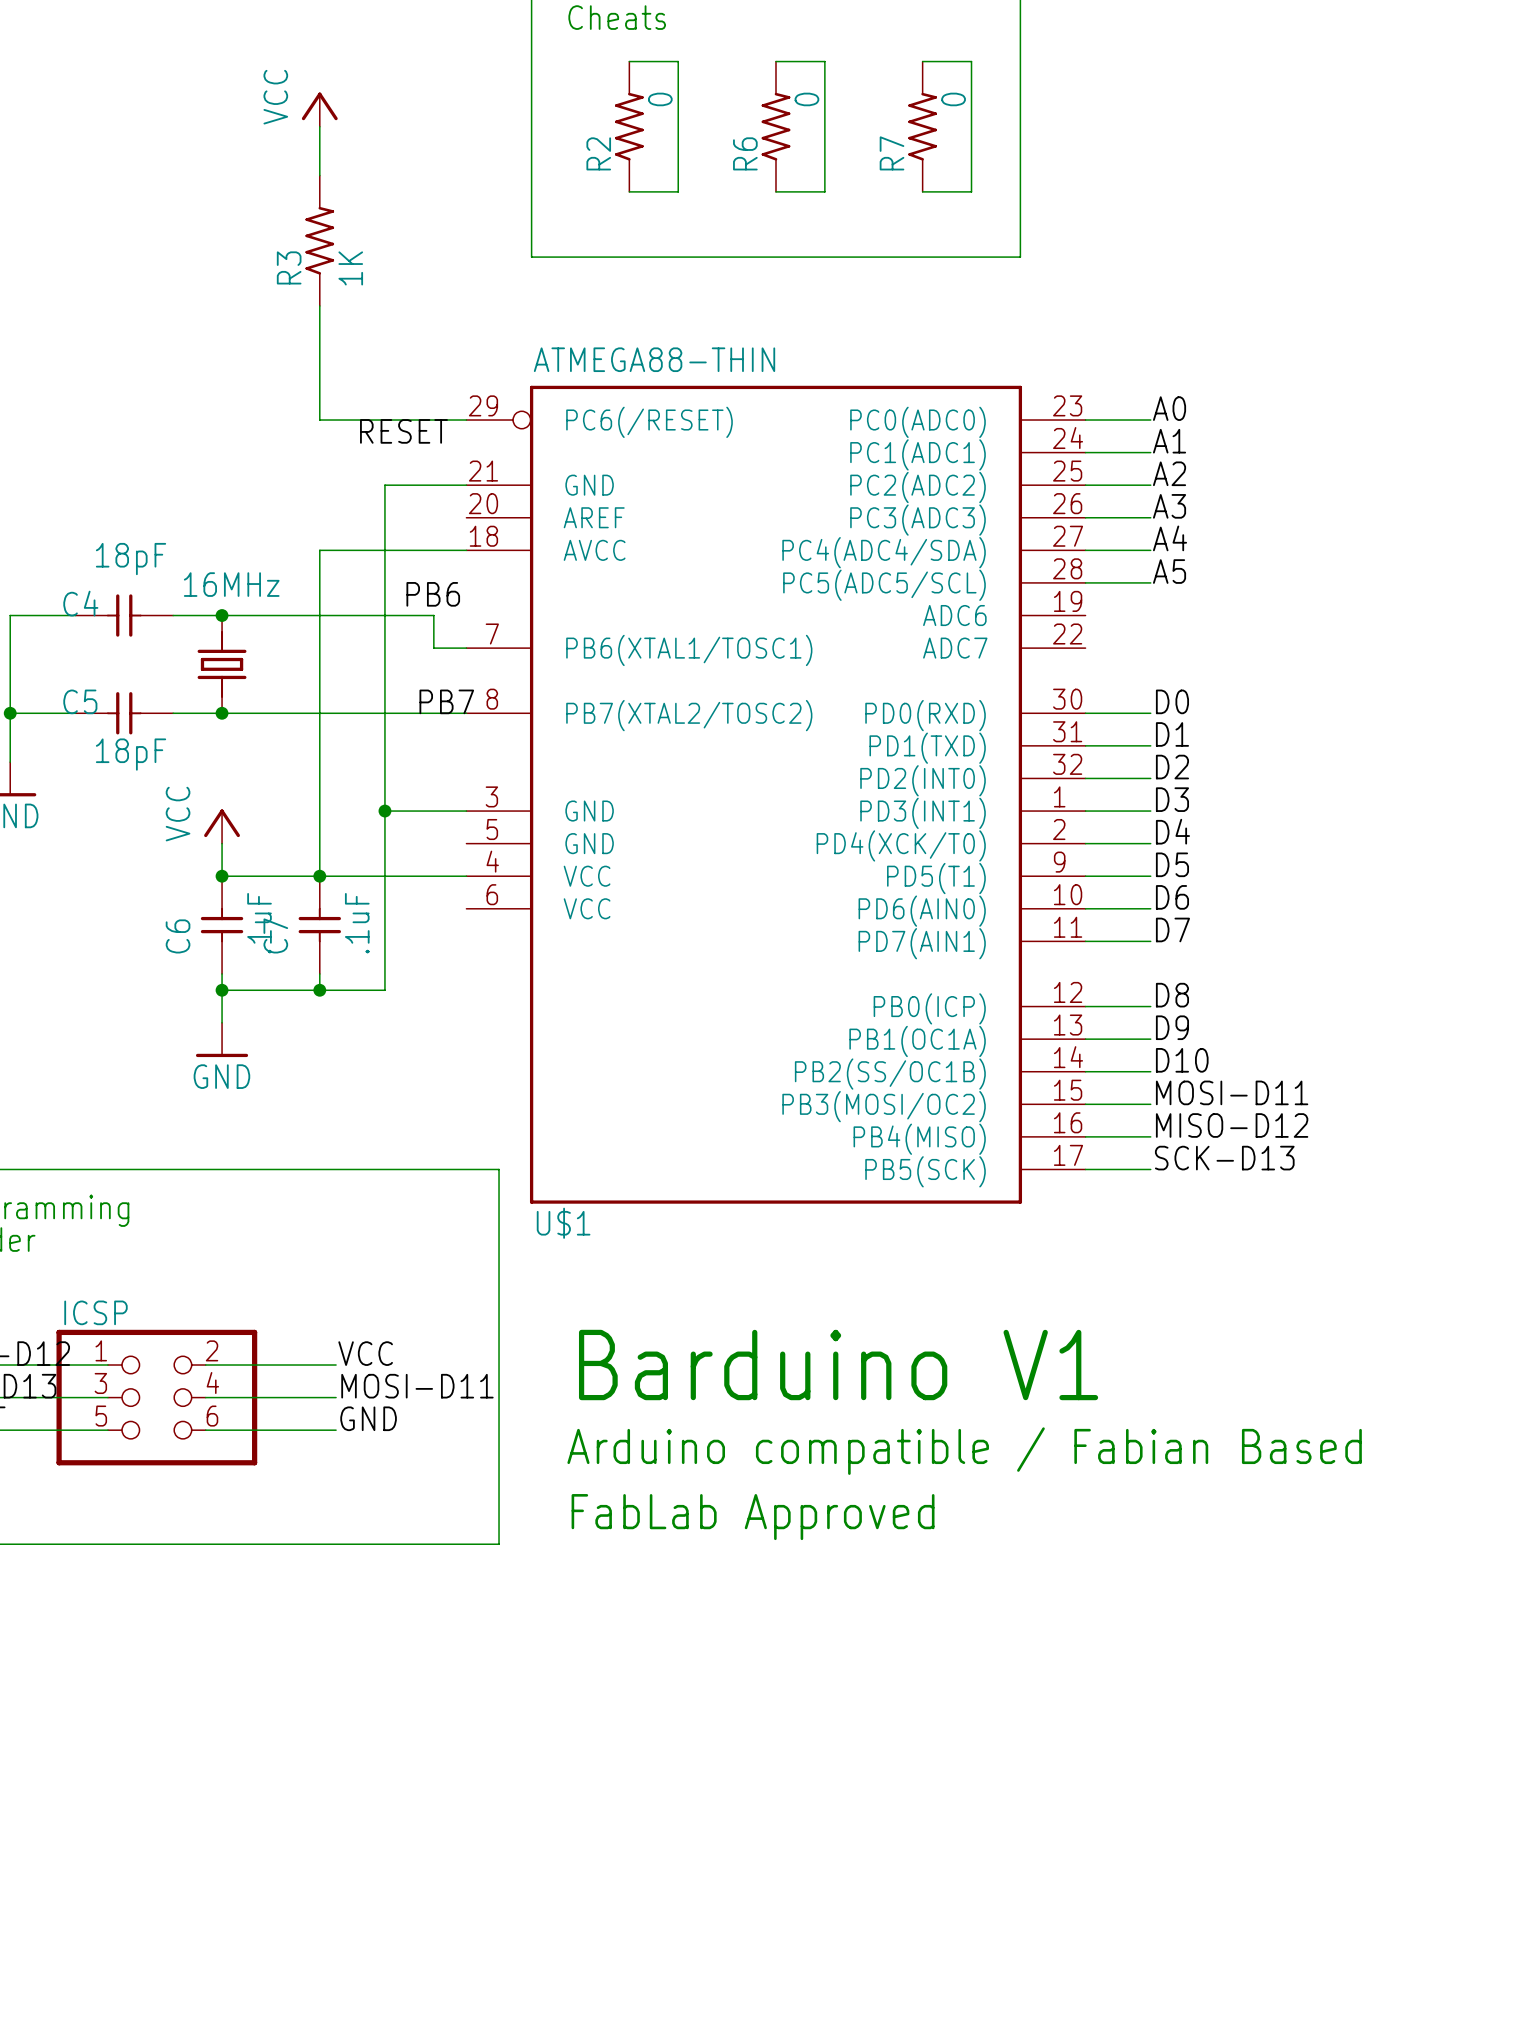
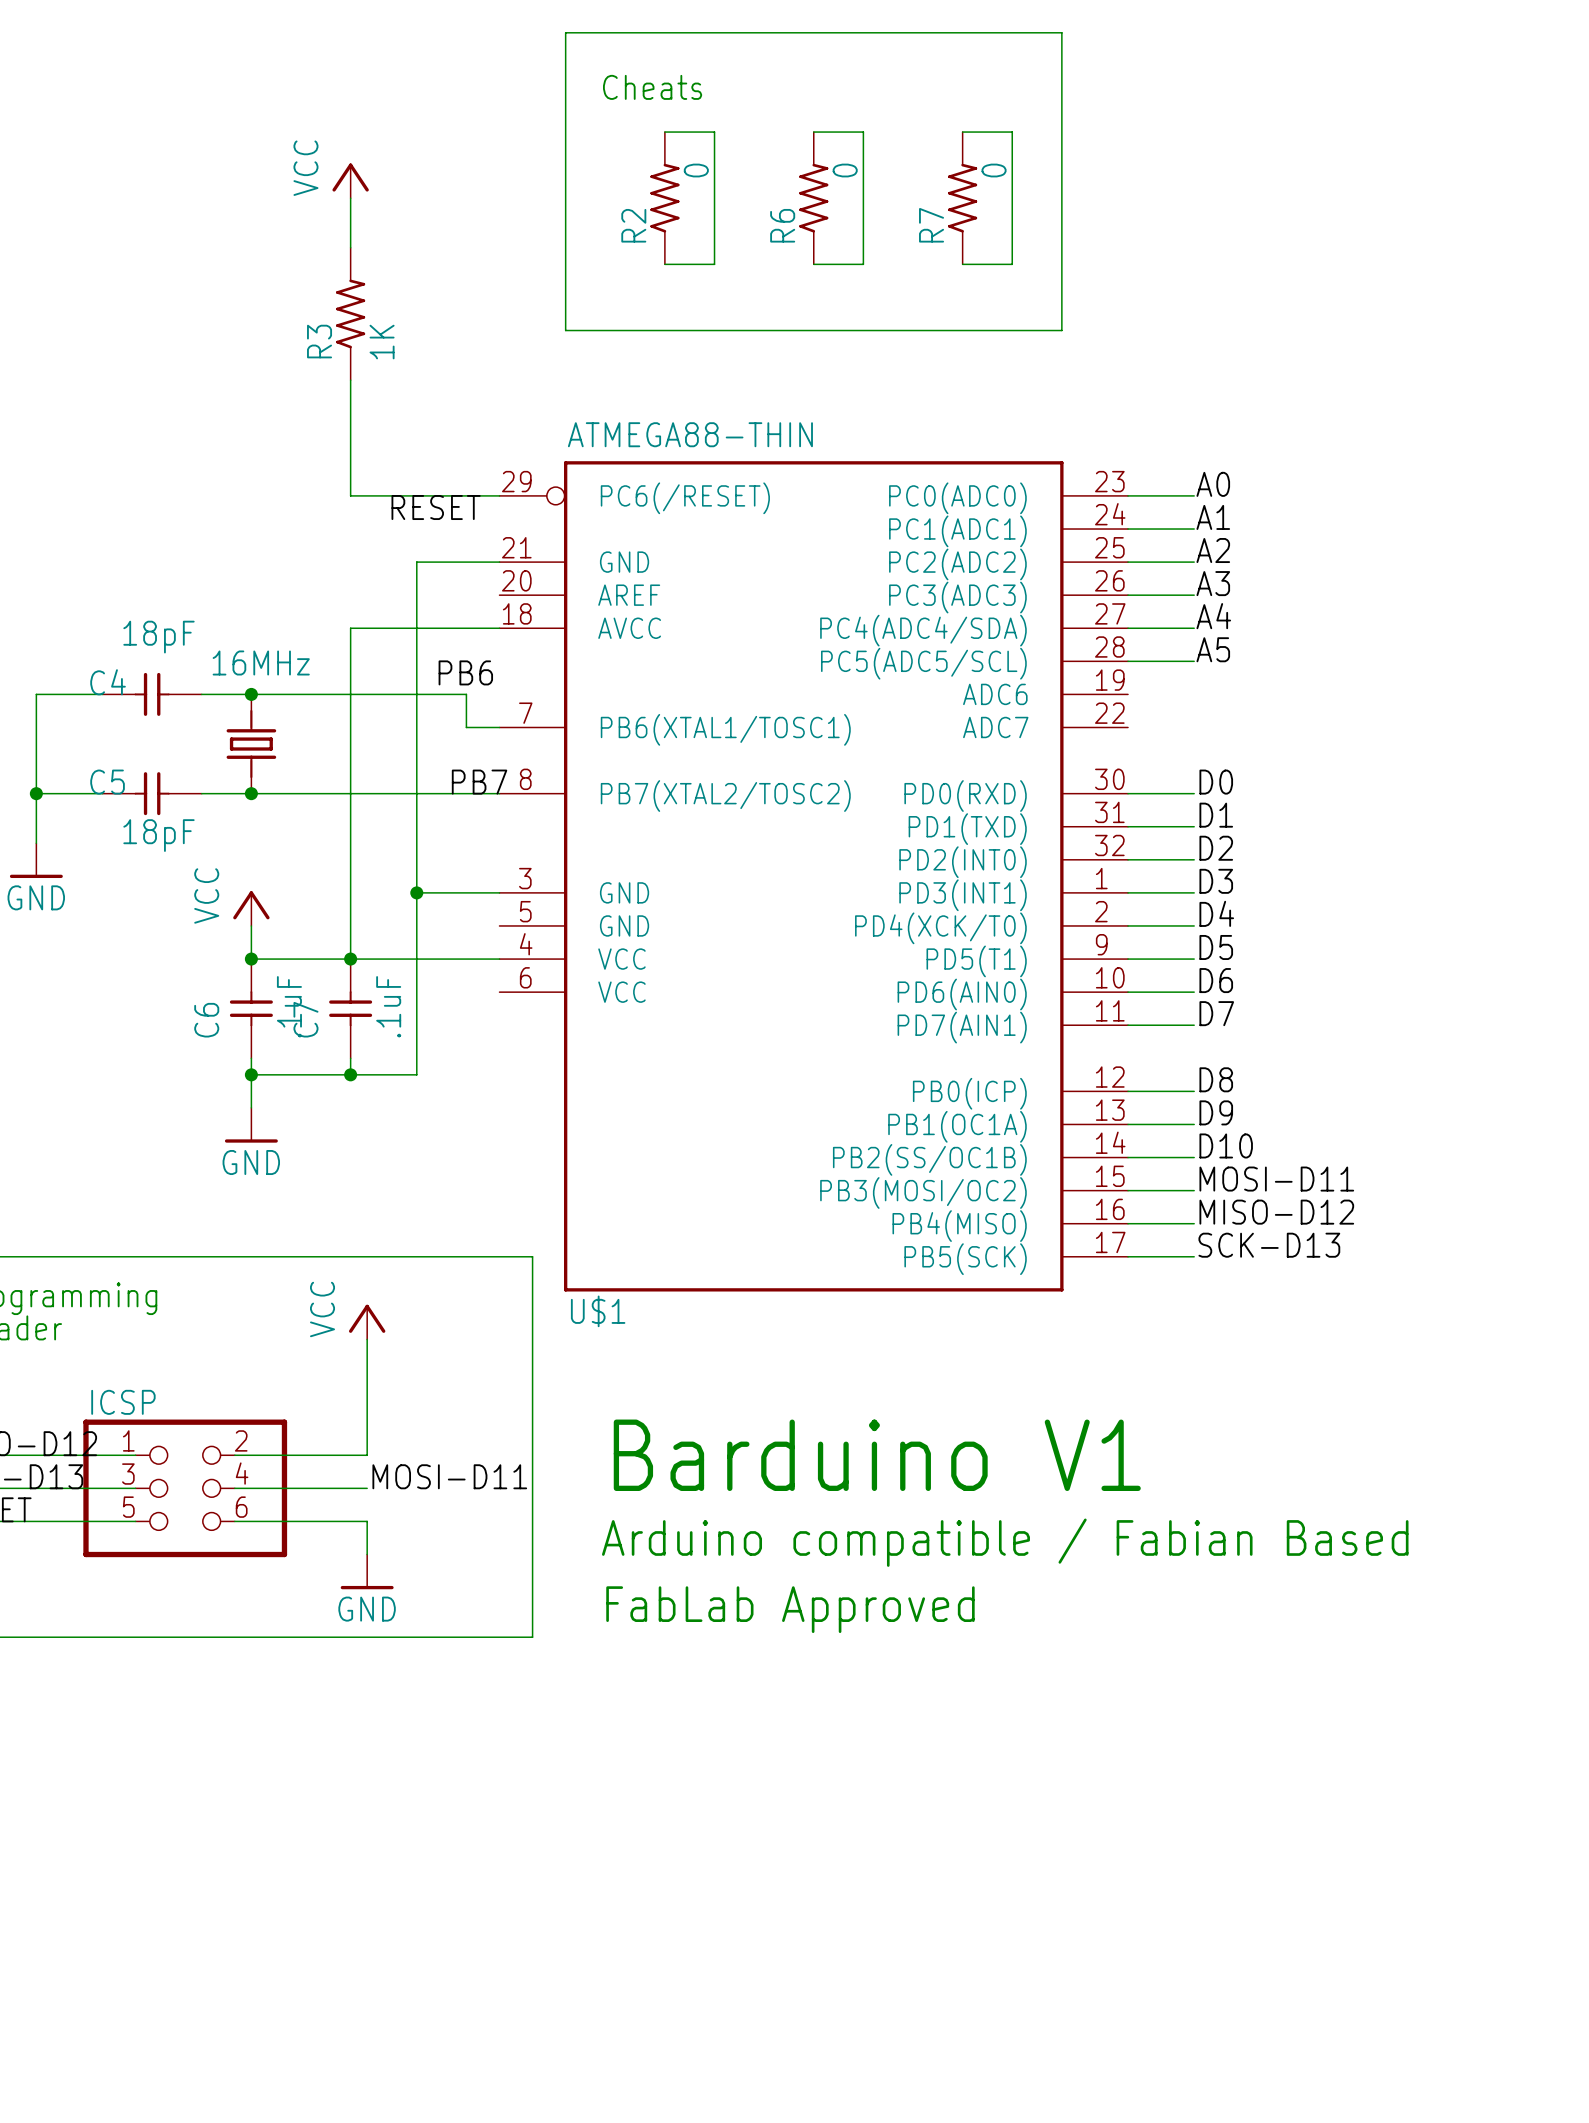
power symbol: none -> VCC (367, 1322)
wire: none -> (367, 1339) (367, 1455)
label: VCC (365, 1353) -> none
label: GND (368, 1418) -> none
wire: none -> (367, 1521) (367, 1554)
power symbol: none -> GND (367, 1571)

